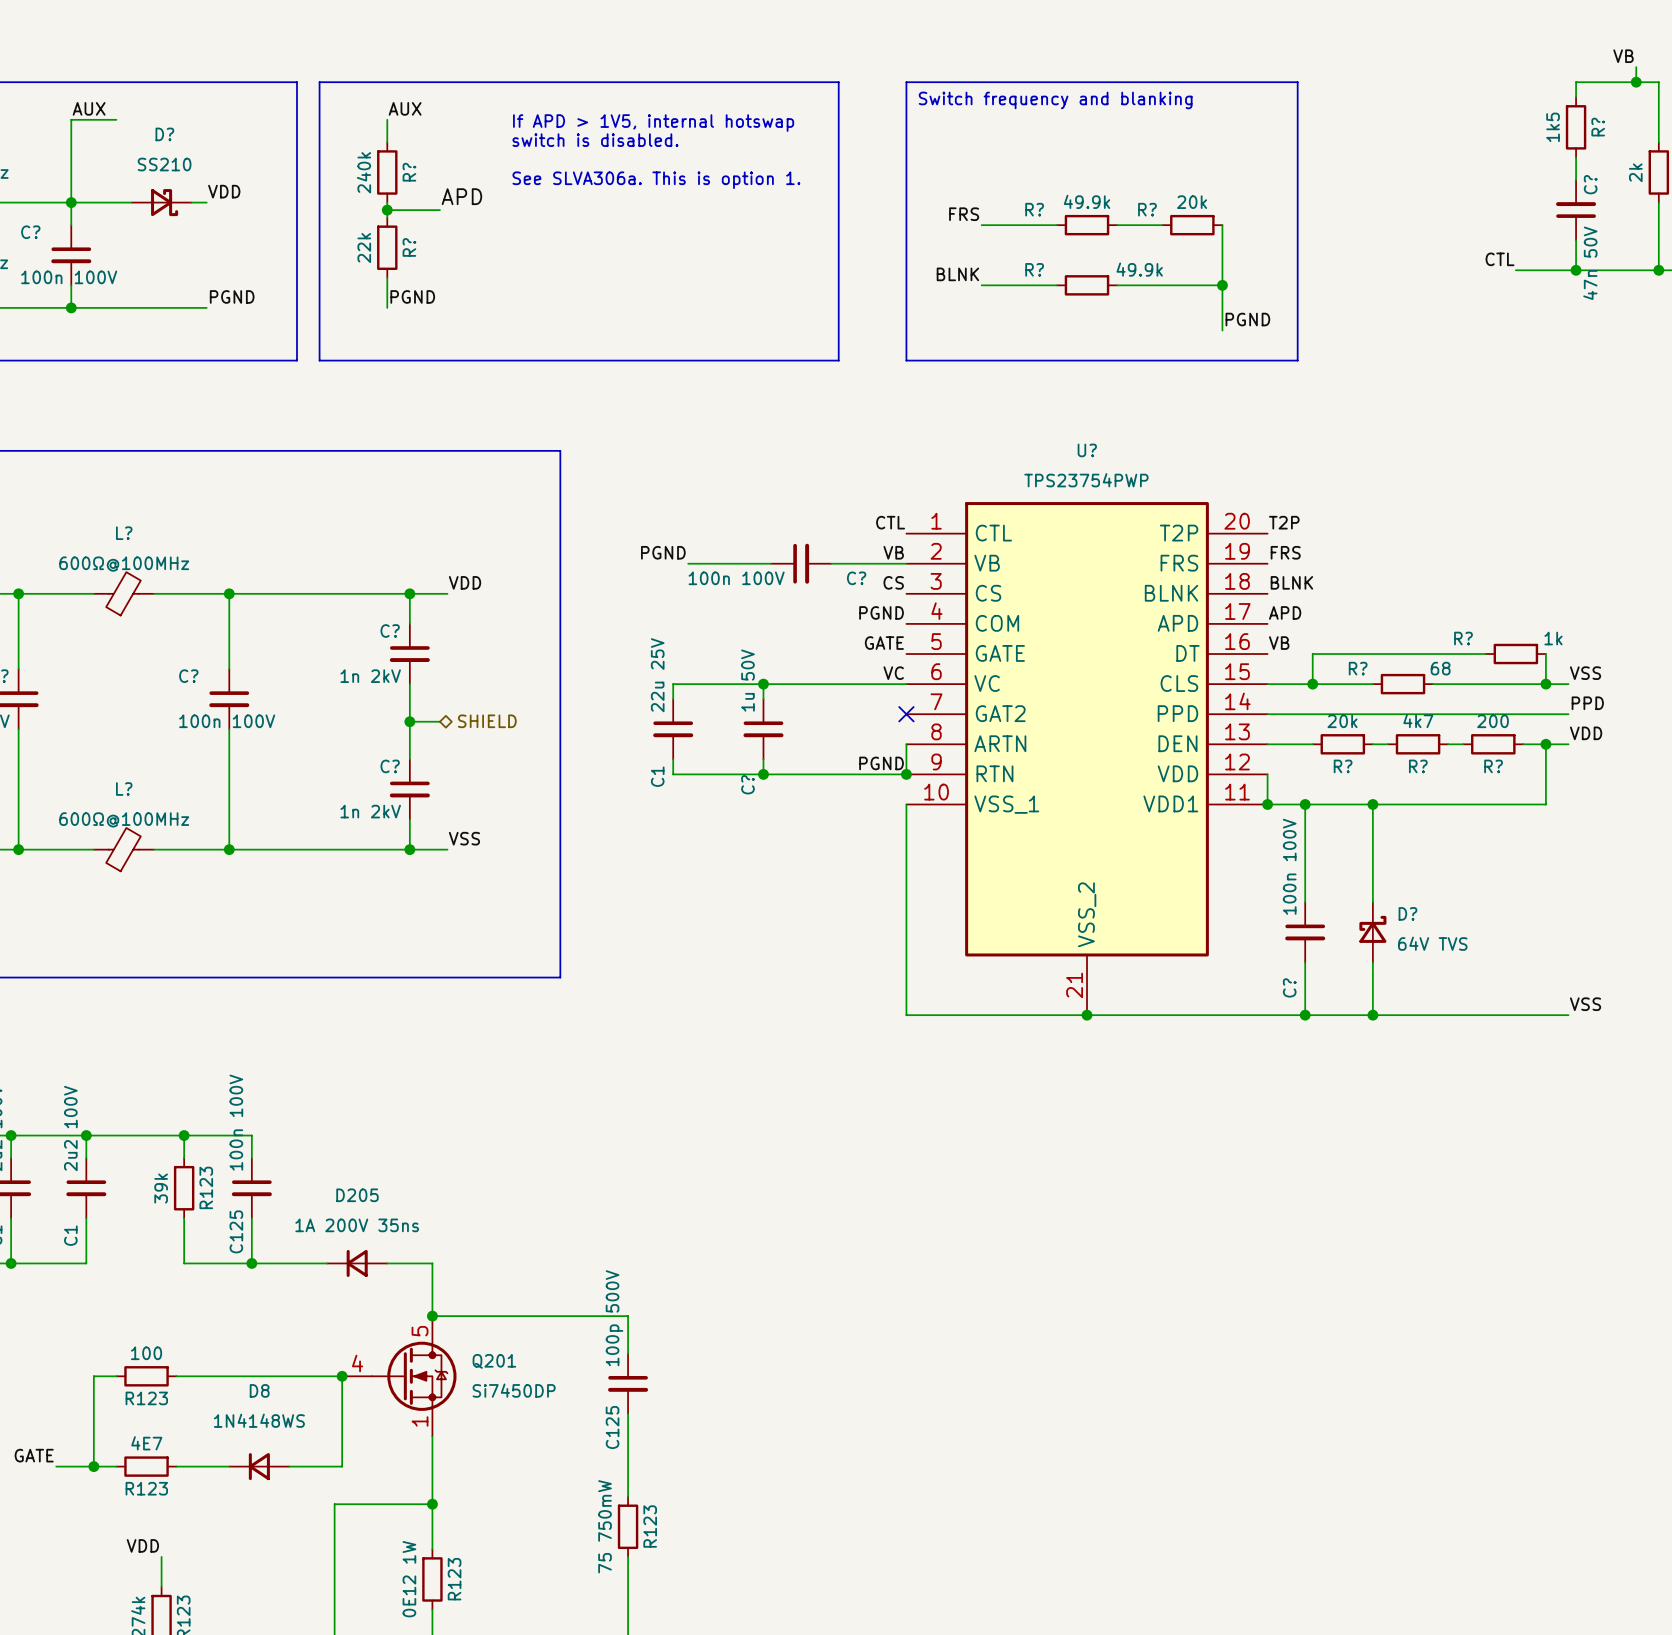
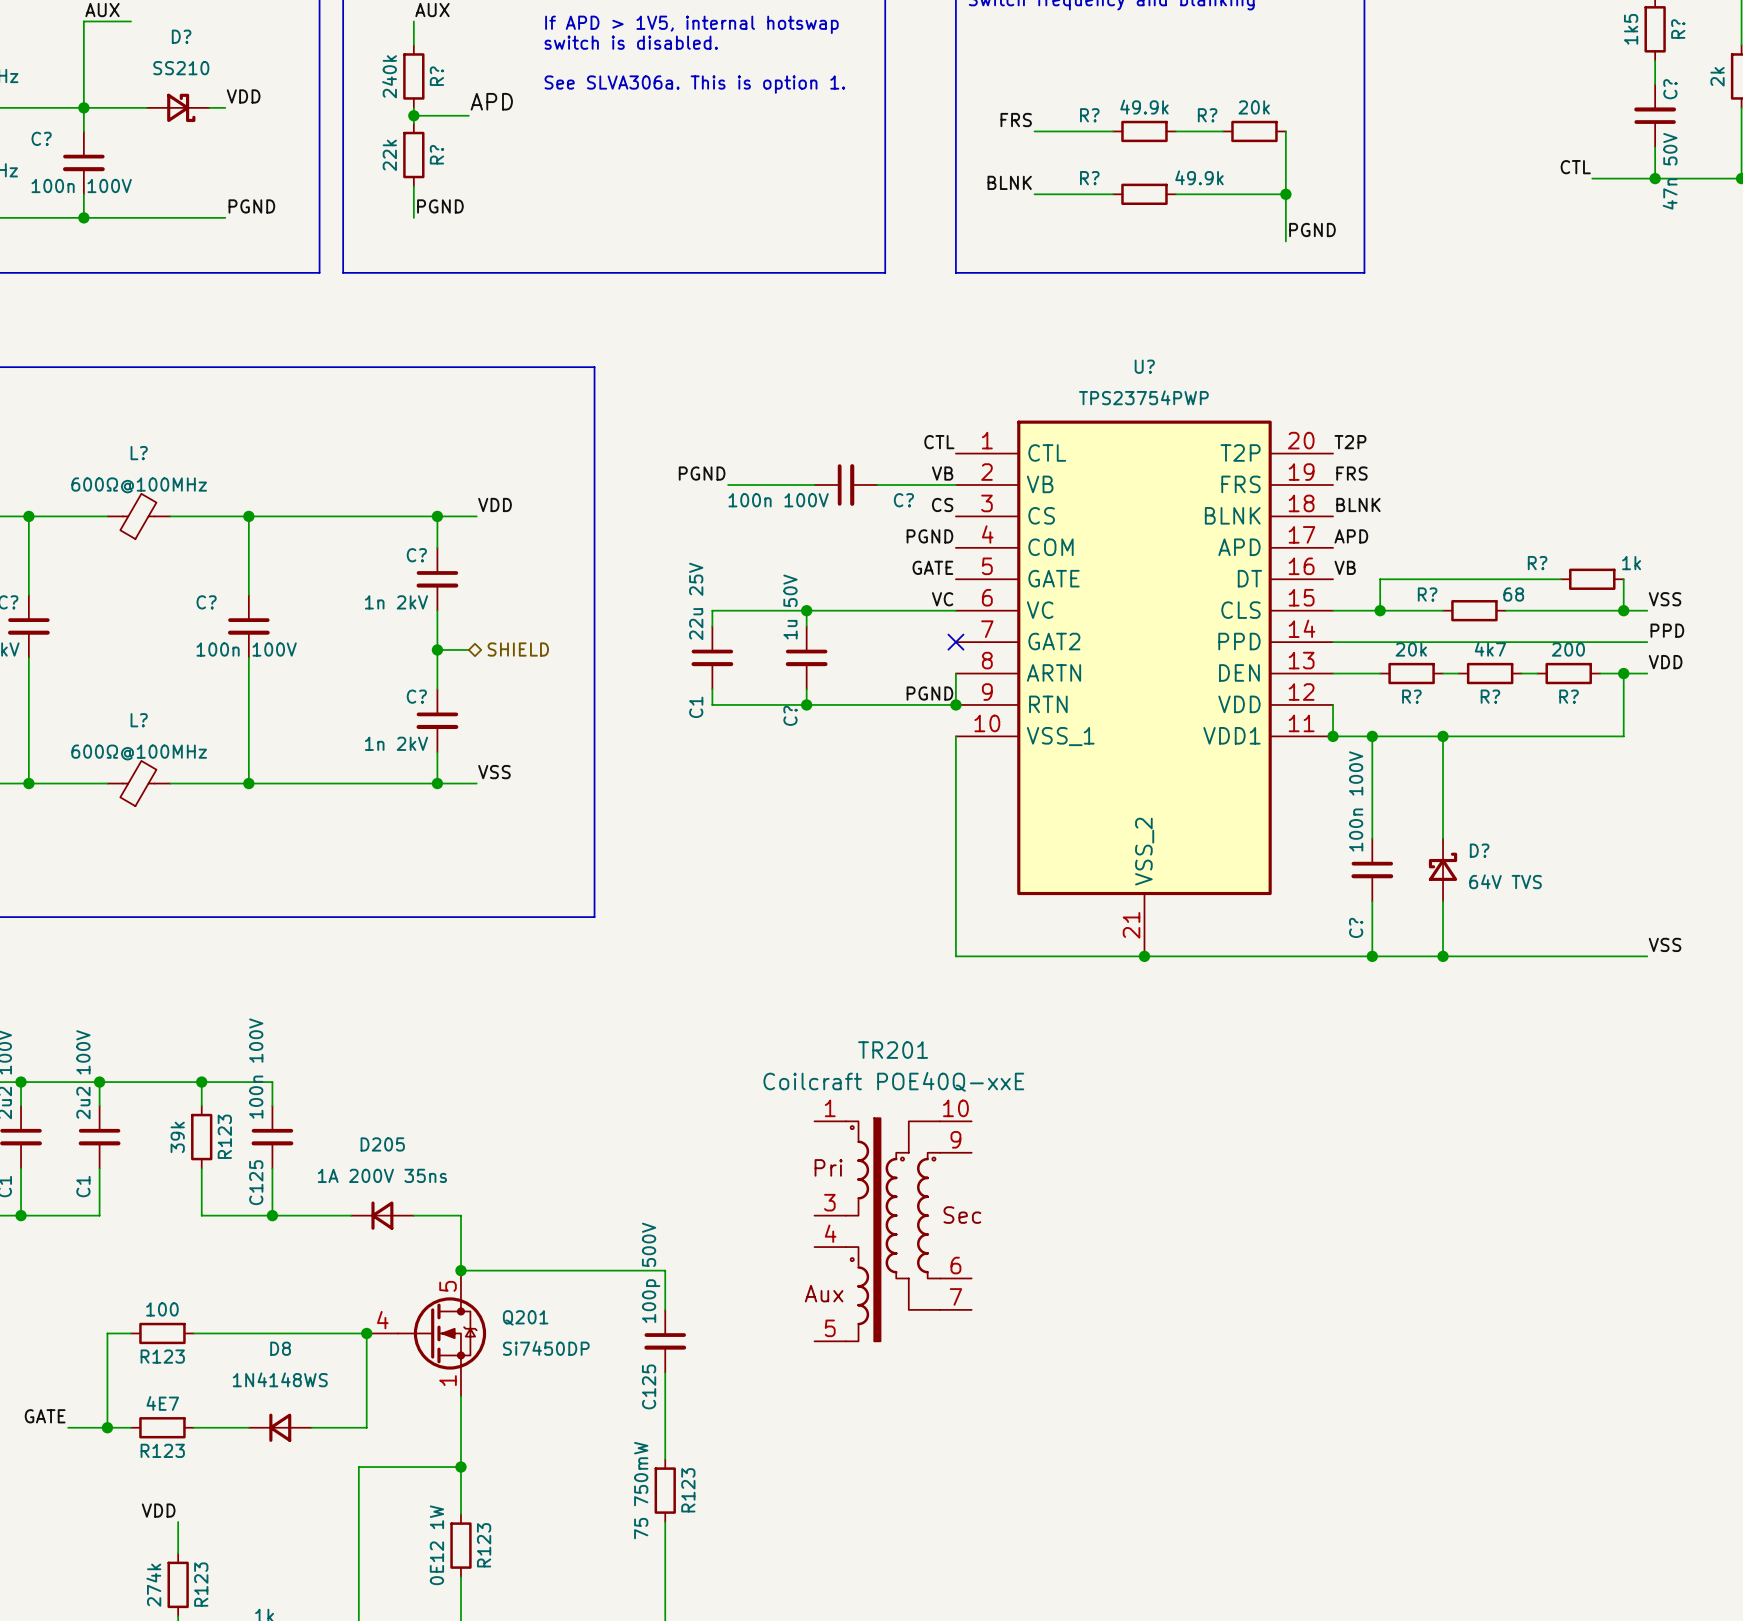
TR201: none -> Coilcraft POE40Q-xxE (893, 1229)

